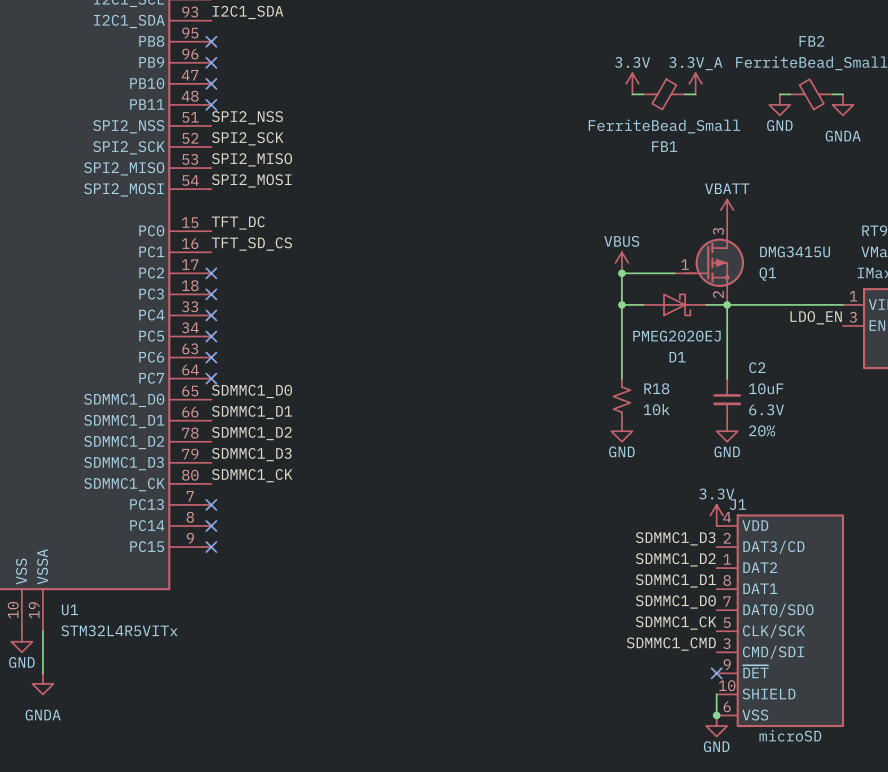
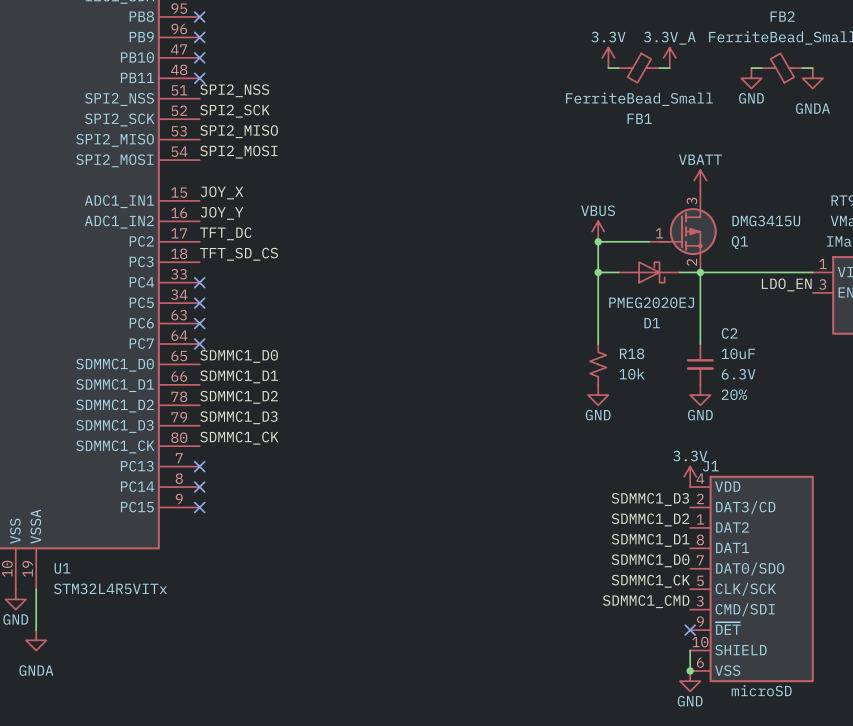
label: TFT_DC (238, 223) -> JOY_X (222, 192)
U1 pin name: PC0 (151, 230) -> ADC1_IN1 (119, 201)
label: TFT_SD_CS (251, 244) -> JOY_Y (222, 213)
U1 pin name: PC1 (151, 251) -> ADC1_IN2 (119, 222)
label: none -> TFT_DC (225, 233)
no-connect mark: (211, 273) -> none
label: none -> TFT_SD_CS (238, 254)
no-connect mark: (211, 294) -> none

